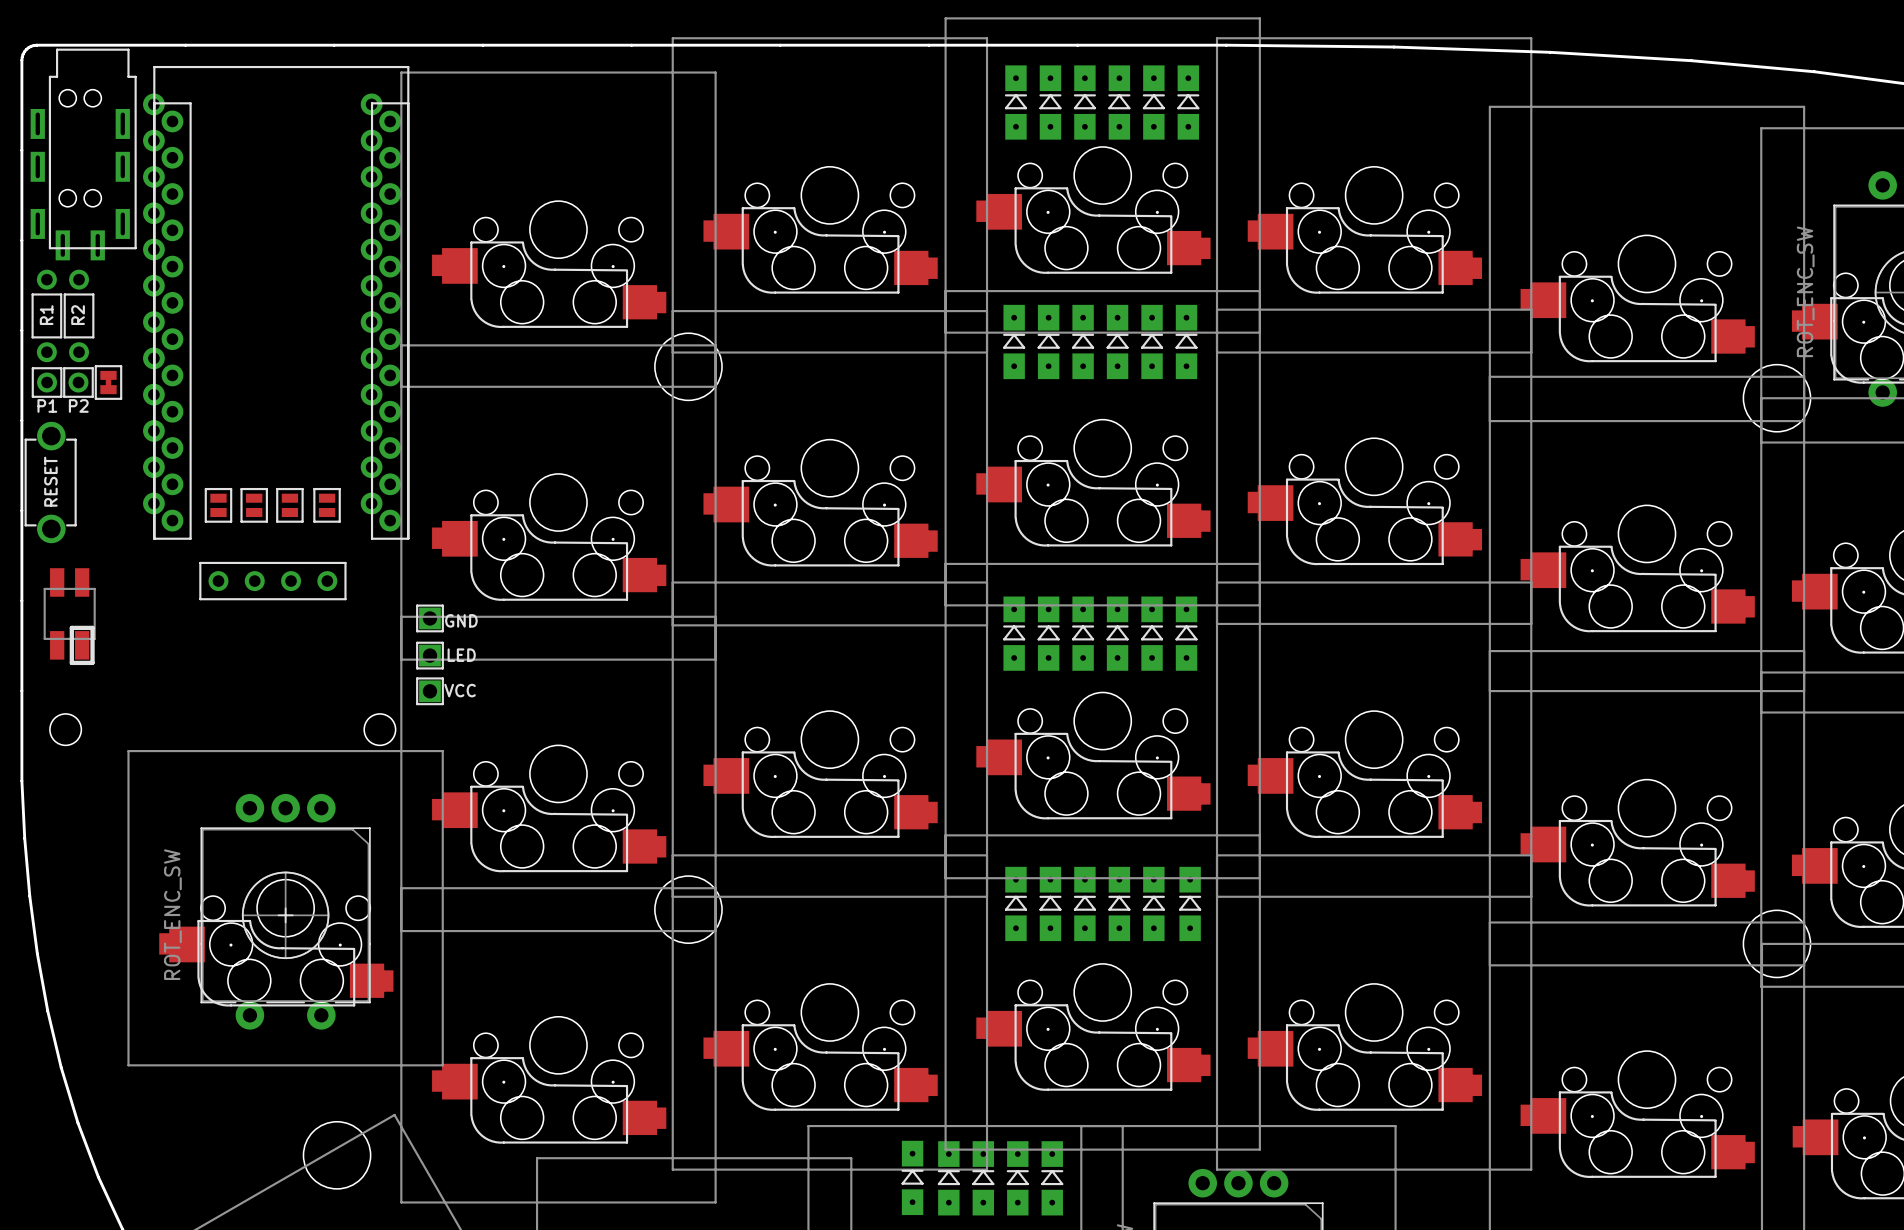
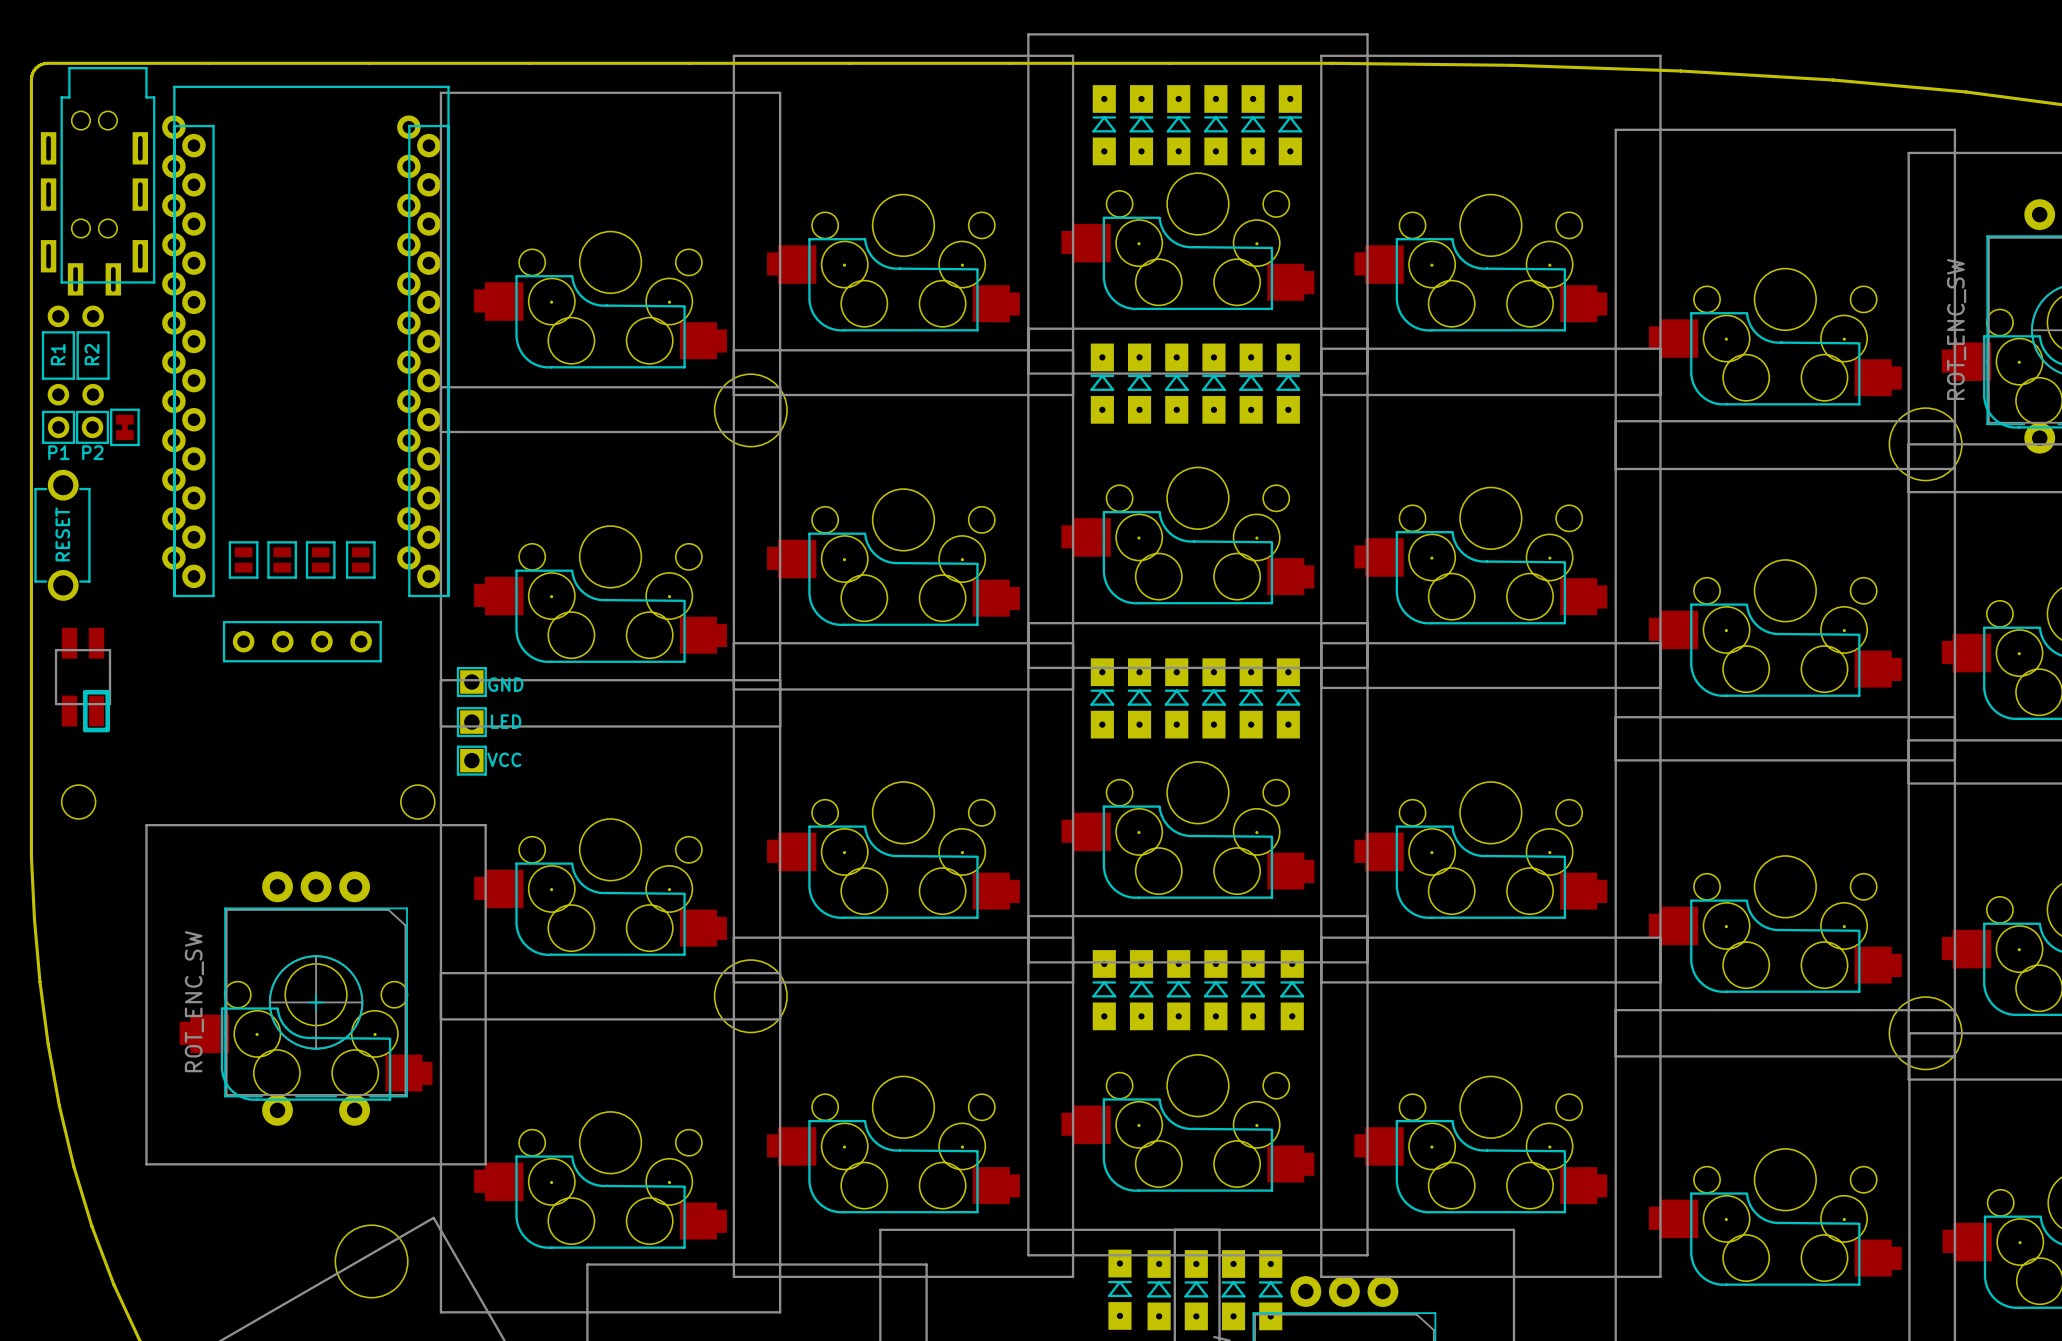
part: (912, 1177) -> none
part: (948, 1178) -> none
part: (983, 1178) -> none
part: (1017, 1178) -> none
part: (1052, 1178) -> none
part: none -> (1119, 1289)
part: none -> (1159, 1290)
part: none -> (1196, 1290)
part: none -> (1233, 1290)
part: none -> (1270, 1290)

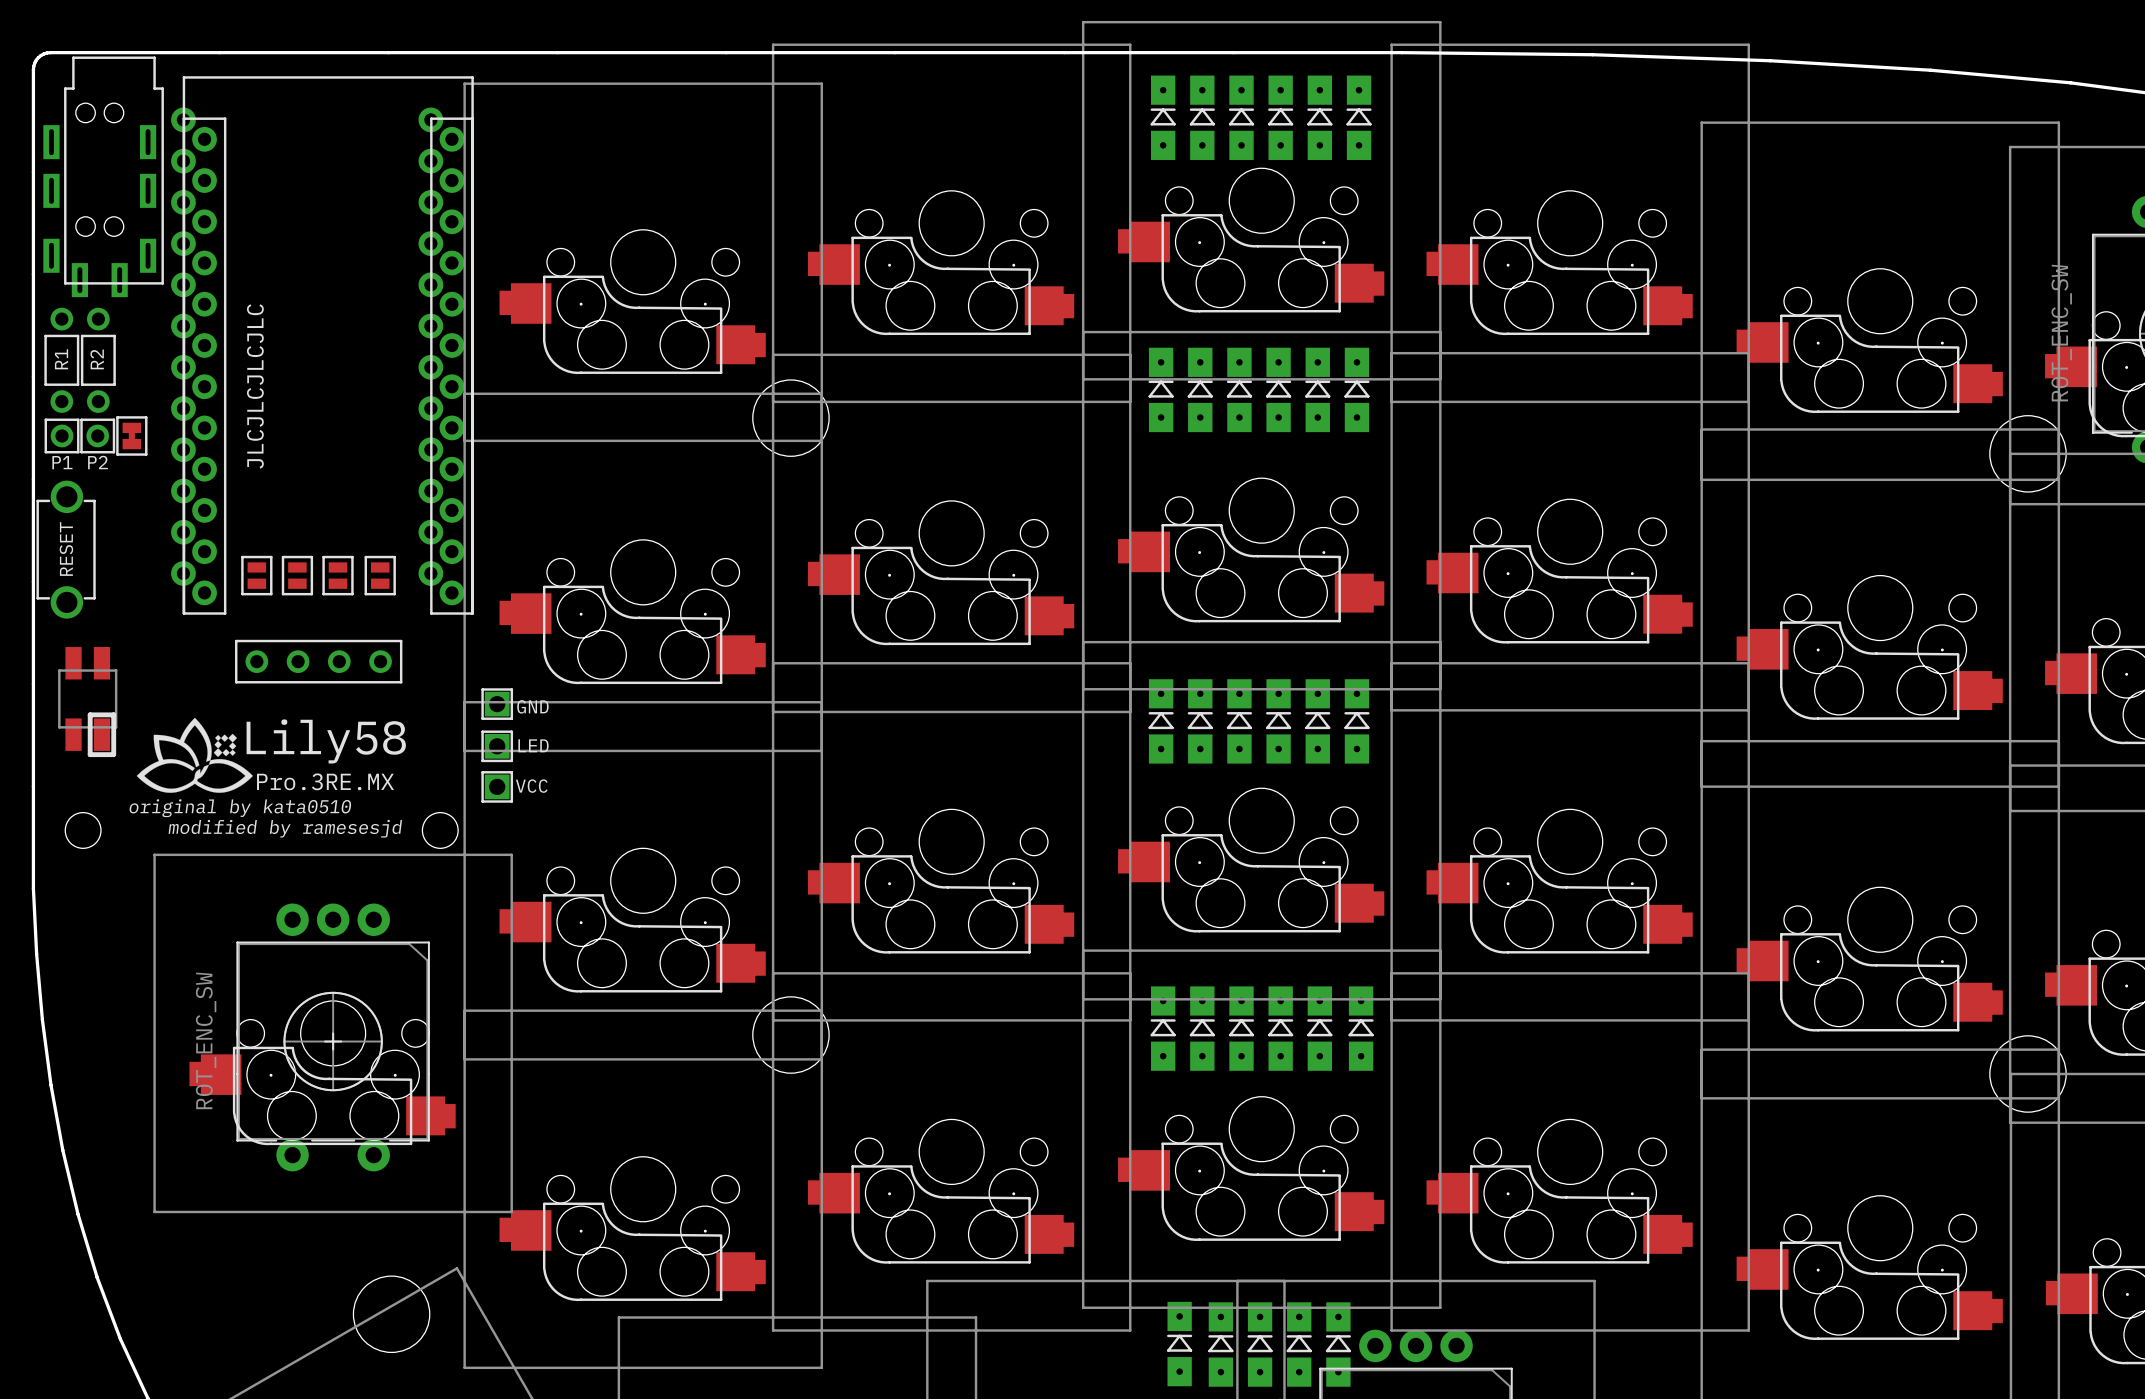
text: none -> JLCJLCJLCJLC (255, 386)
drawing: none -> [136, 717, 253, 793]

